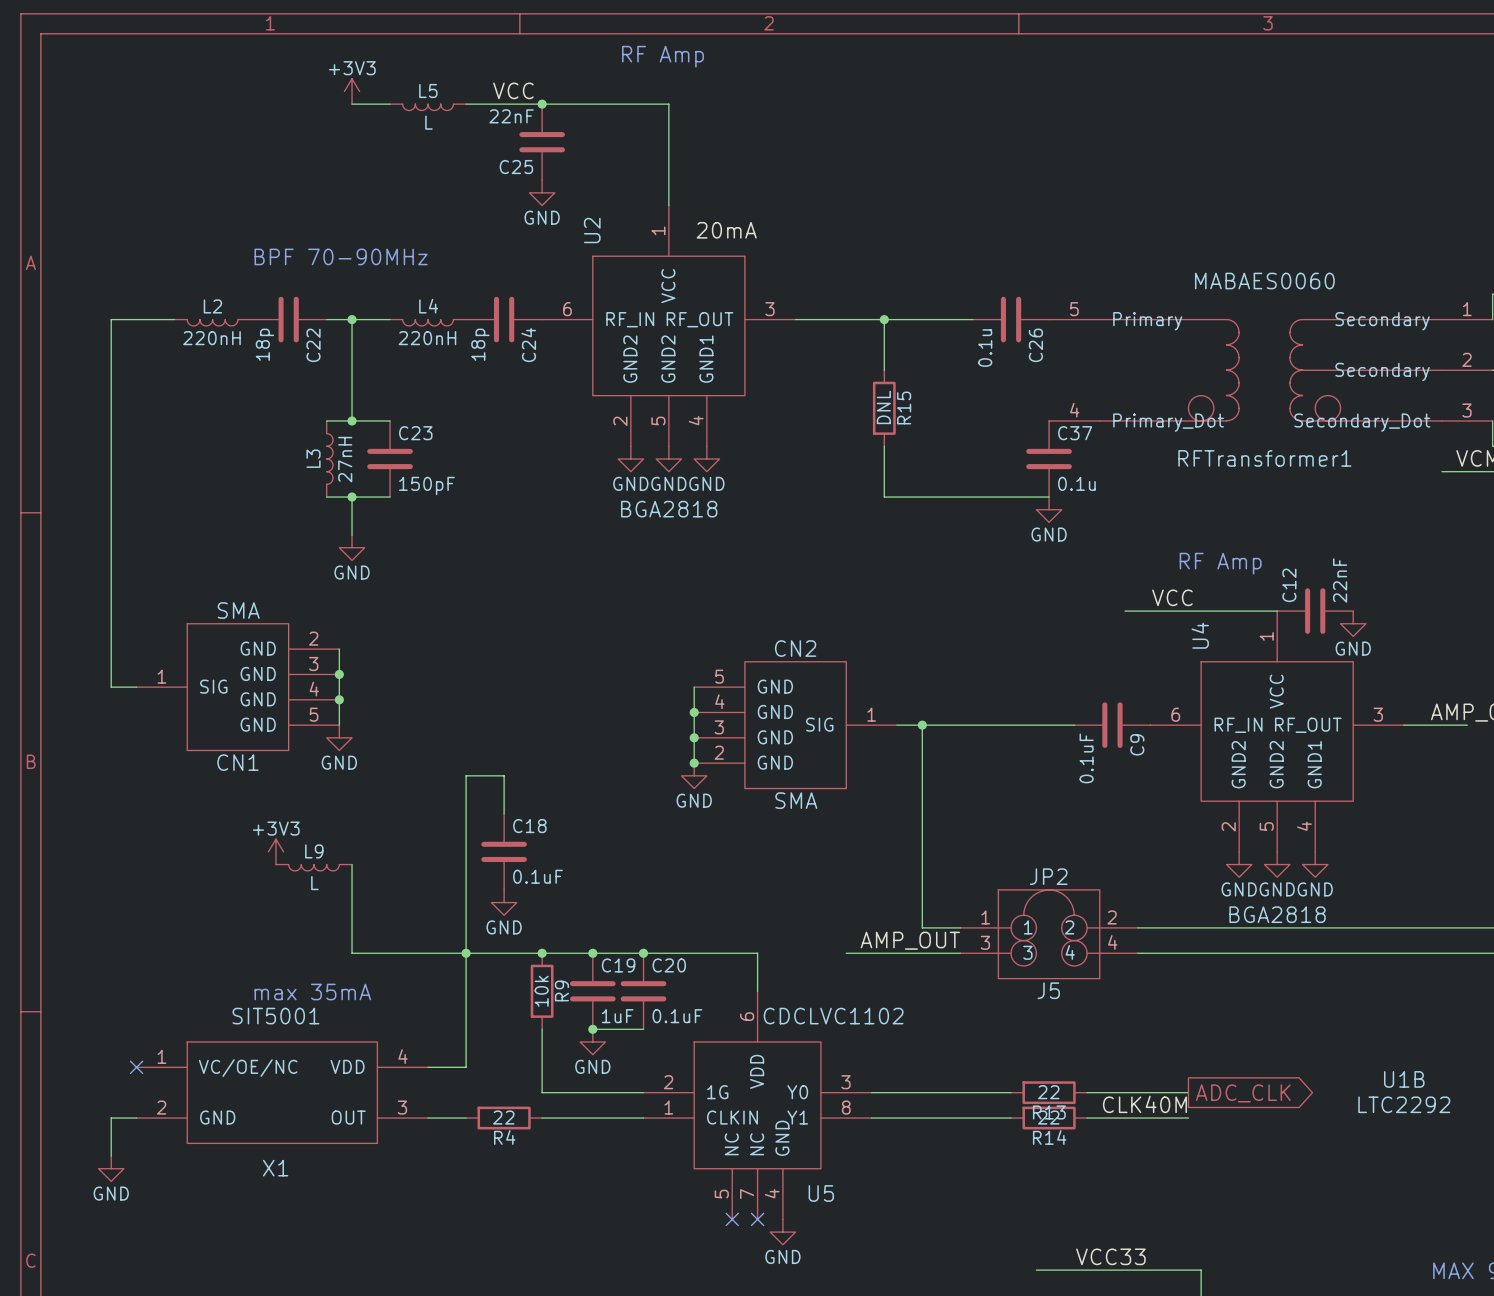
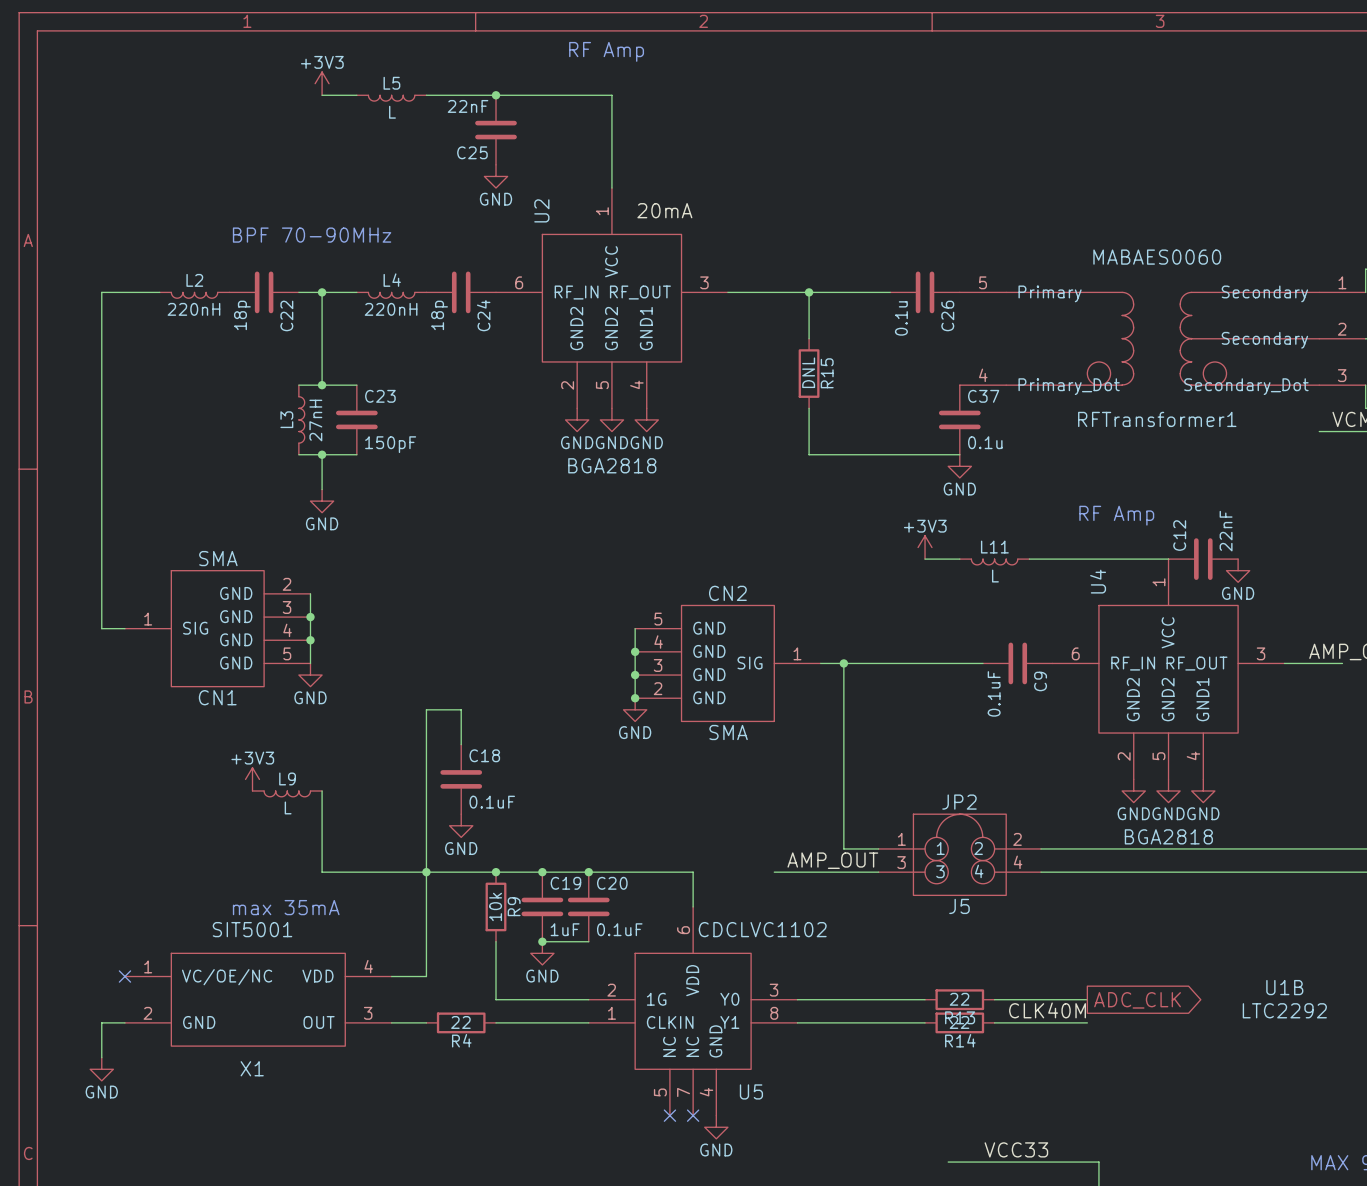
label: VCC (513, 90) -> none
label: VCC (1172, 597) -> none
power symbol: none -> +3V3 (925, 547)
wire: none -> (925, 559) (959, 559)
L11: none -> L (994, 561)

